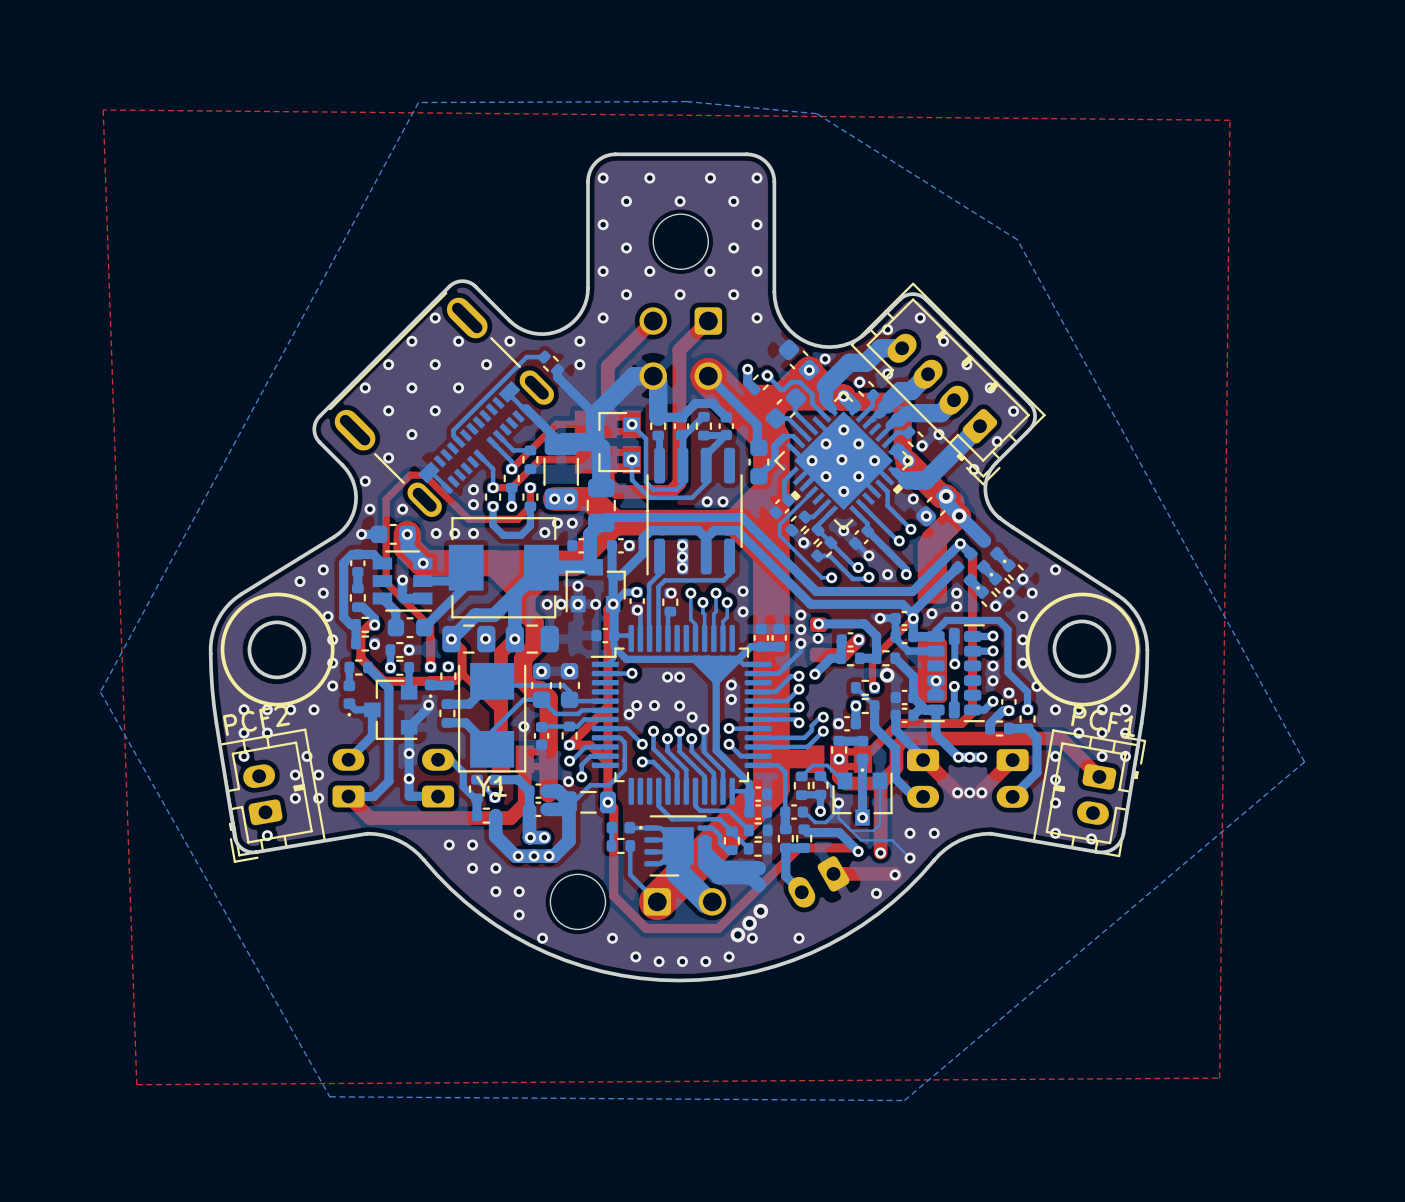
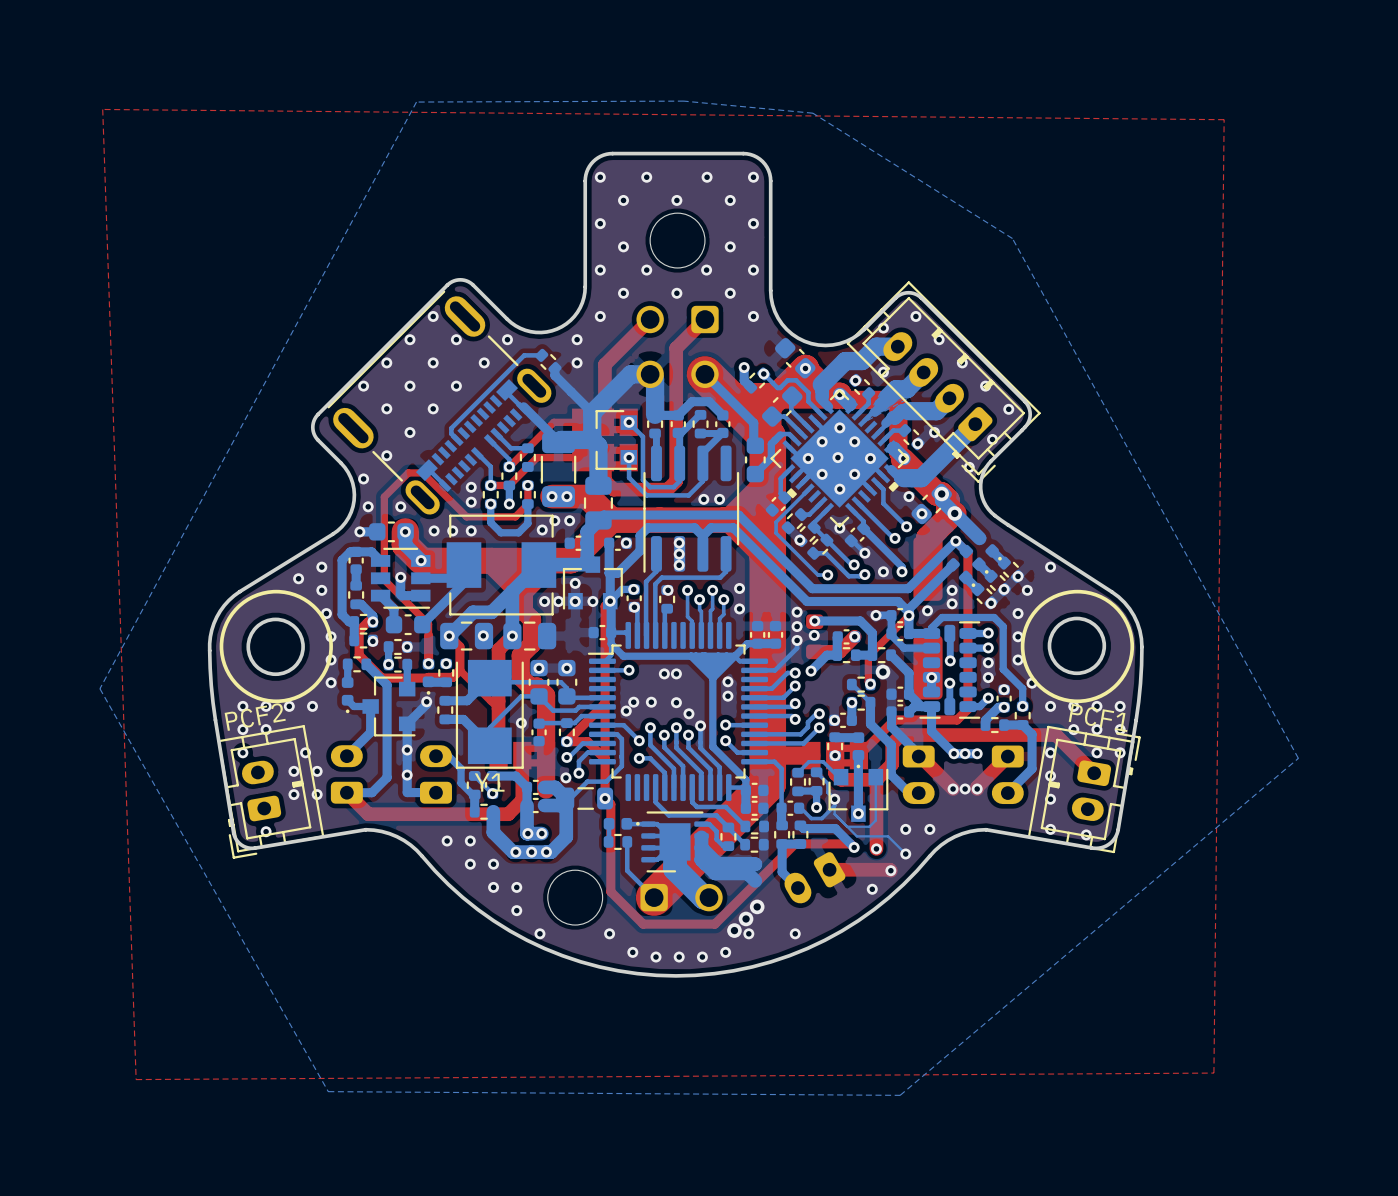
via: (825, 359) -> none

